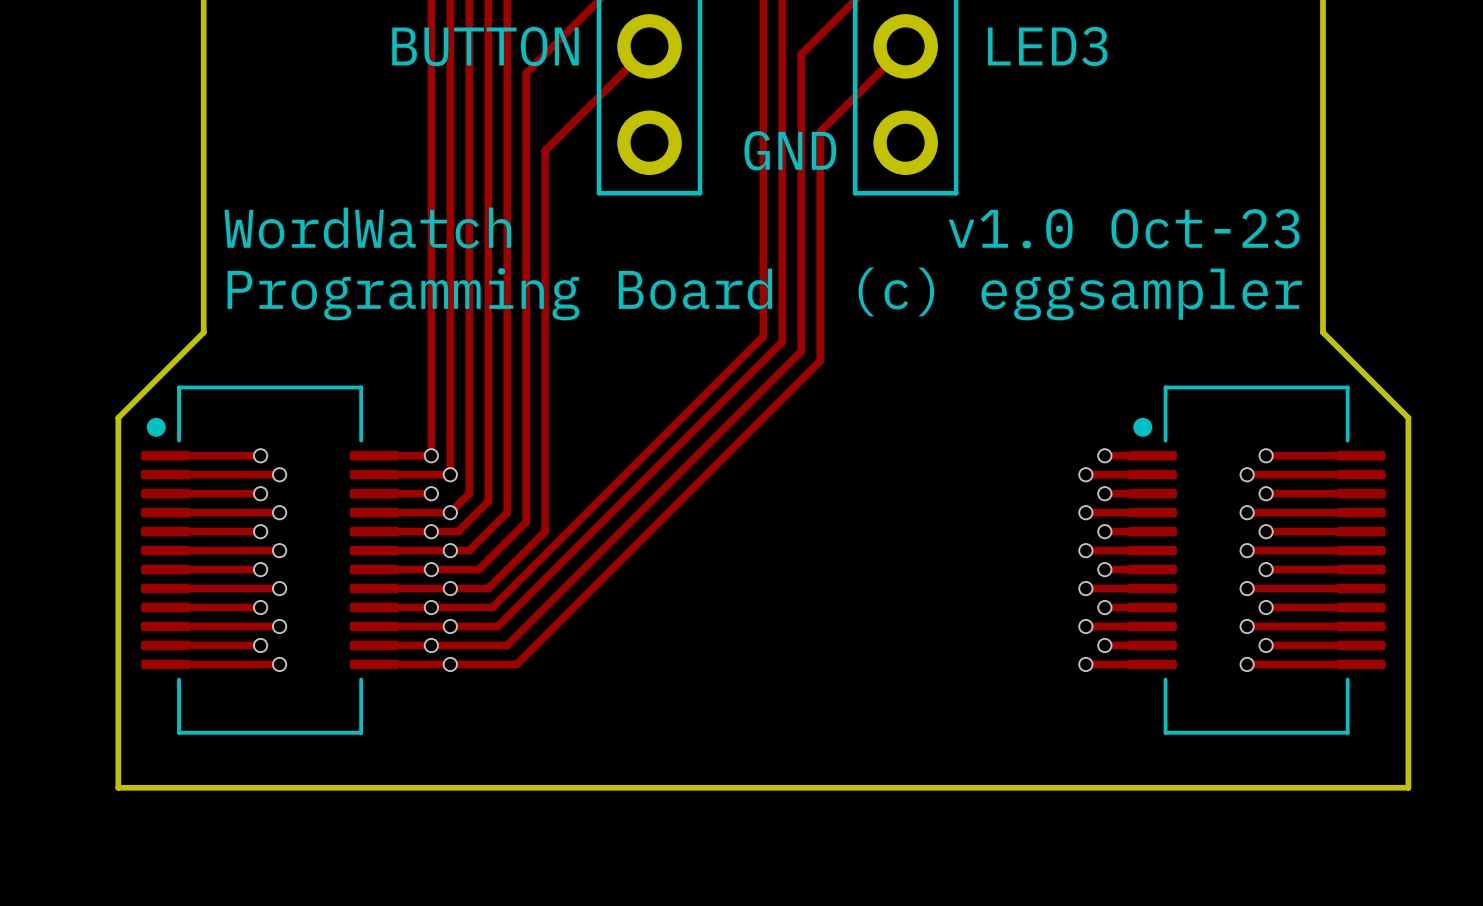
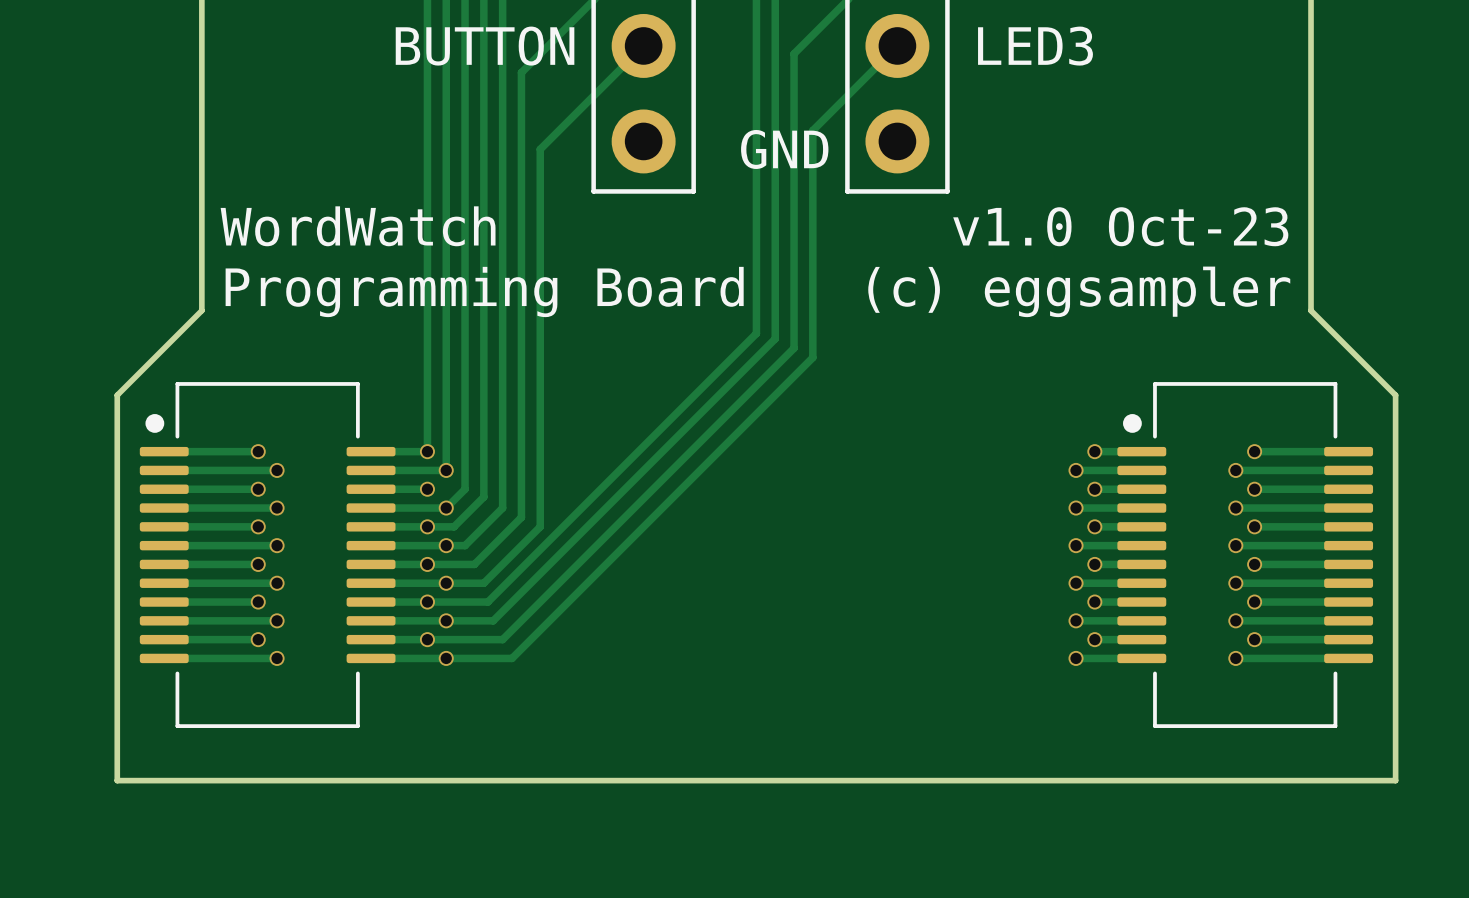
board edge: (203, 313) (203, 332) (118, 417) -> (201, 310) (117, 395) (117, 414)
board edge: (1323, 313) (1323, 332) (1408, 417) -> (1311, 310) (1395, 395) (1395, 414)

